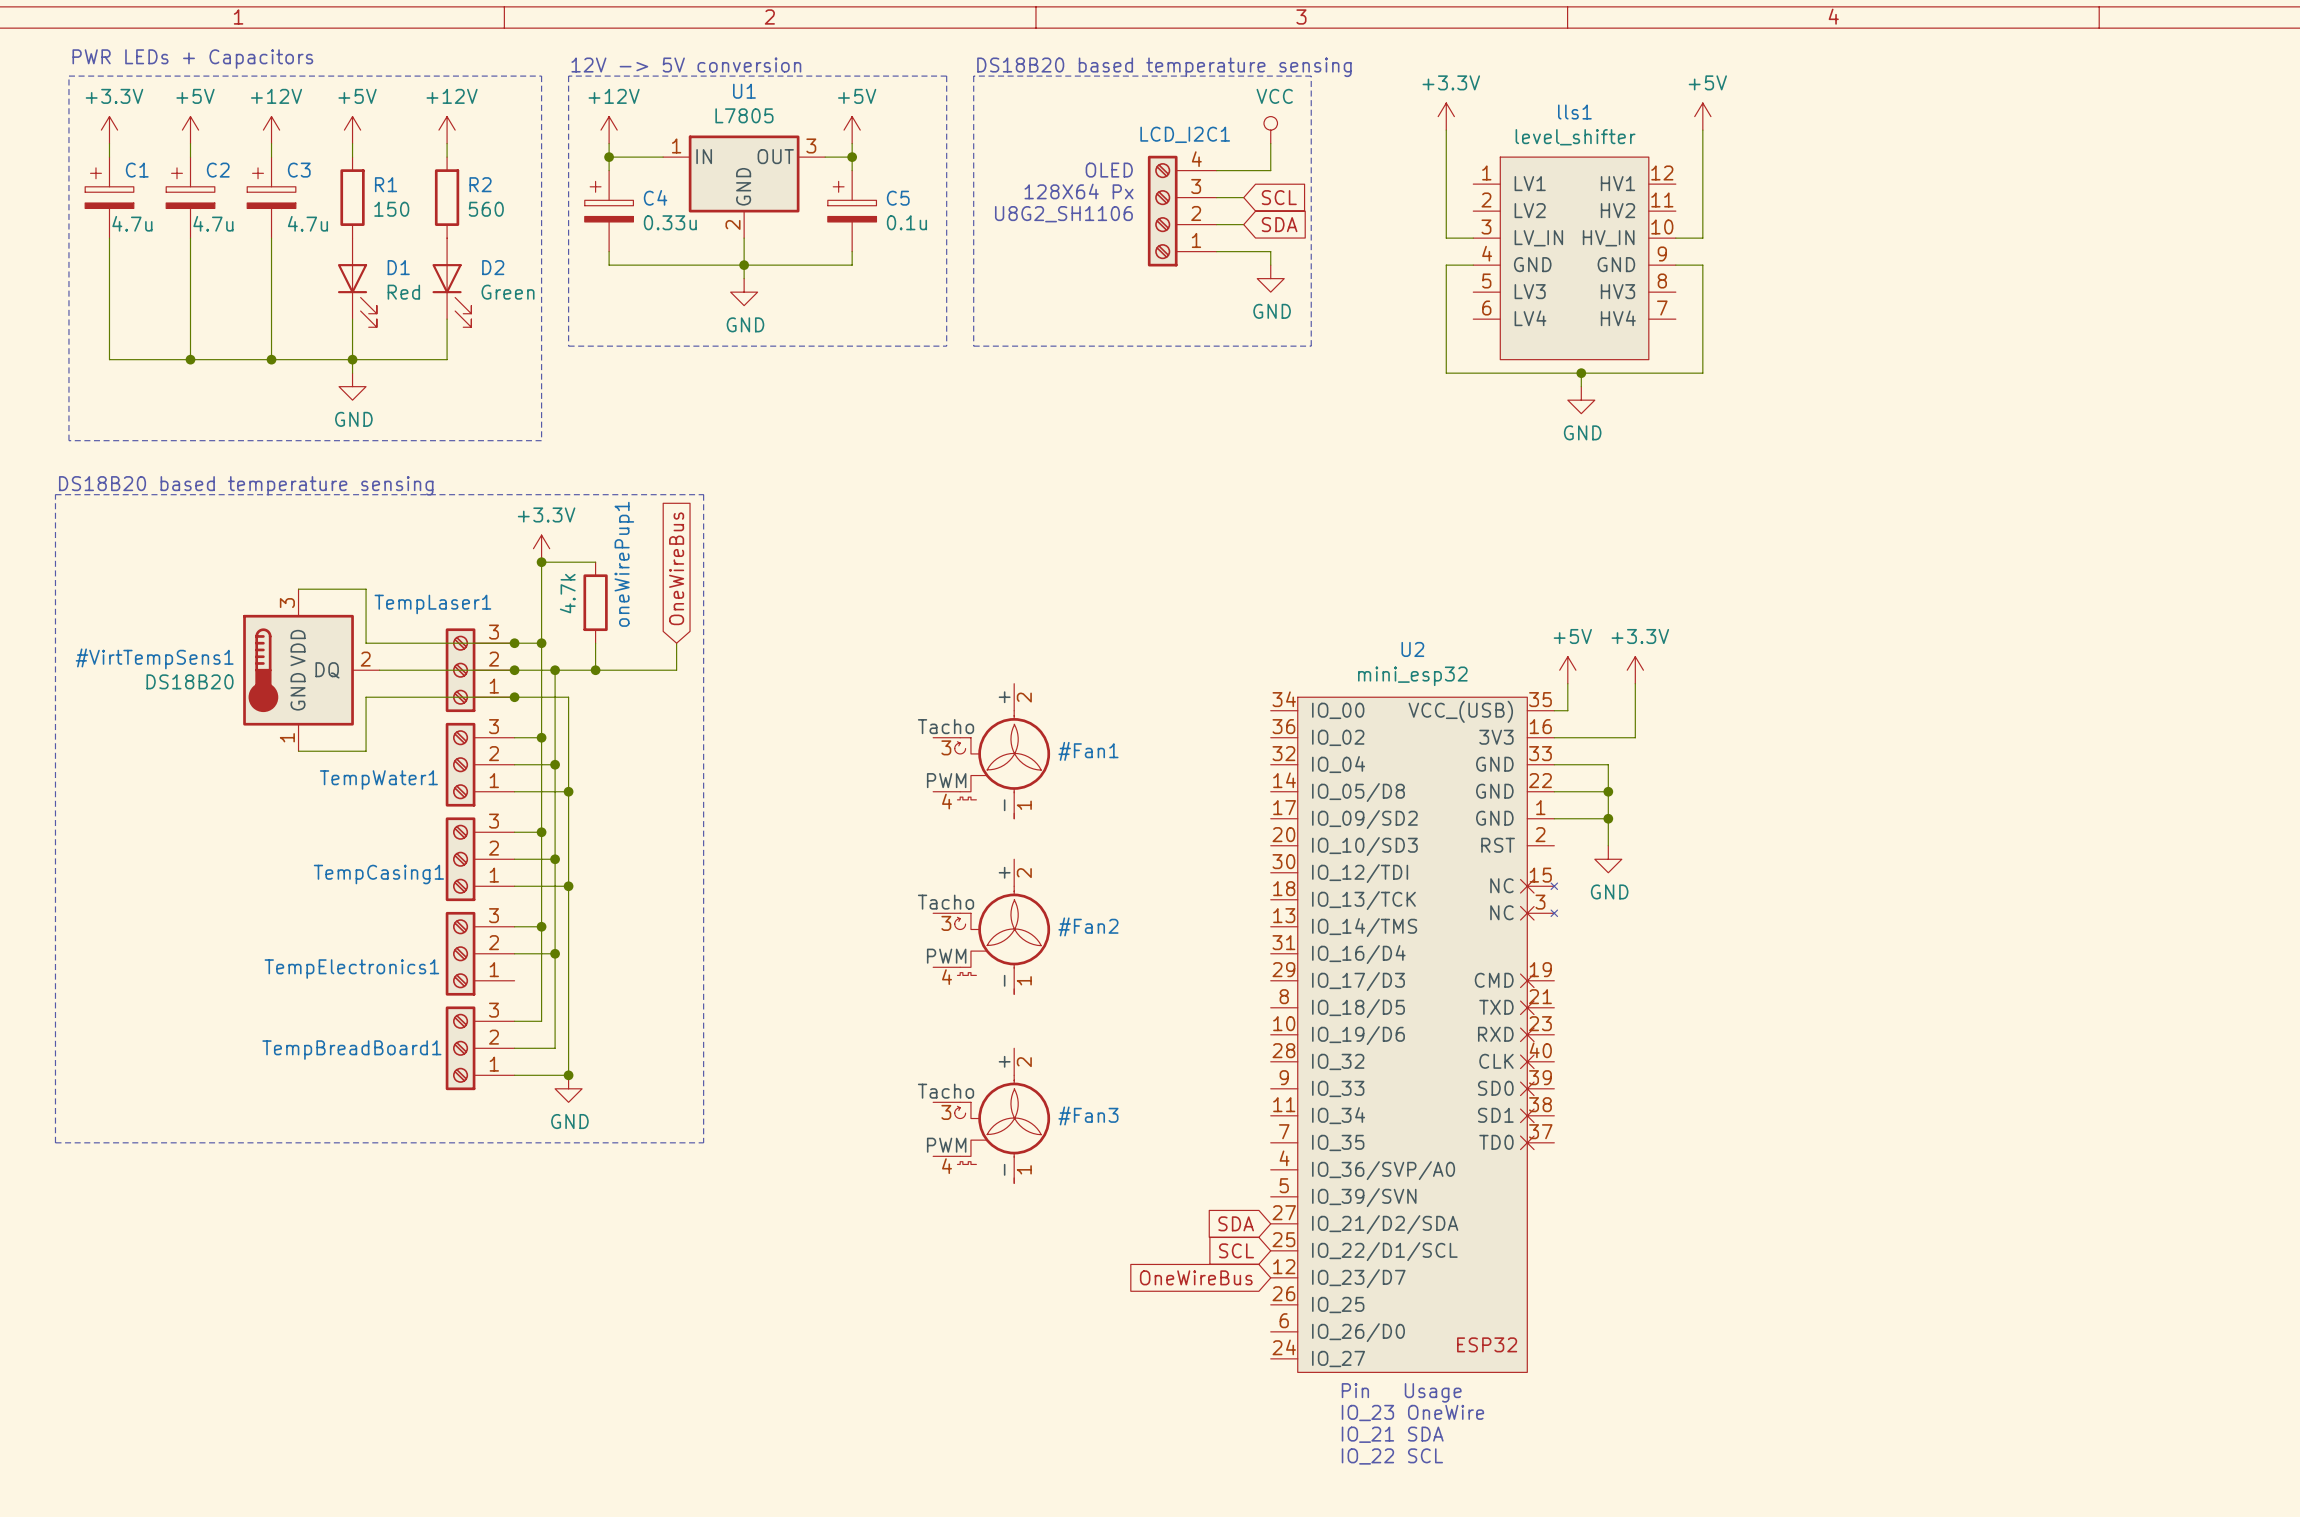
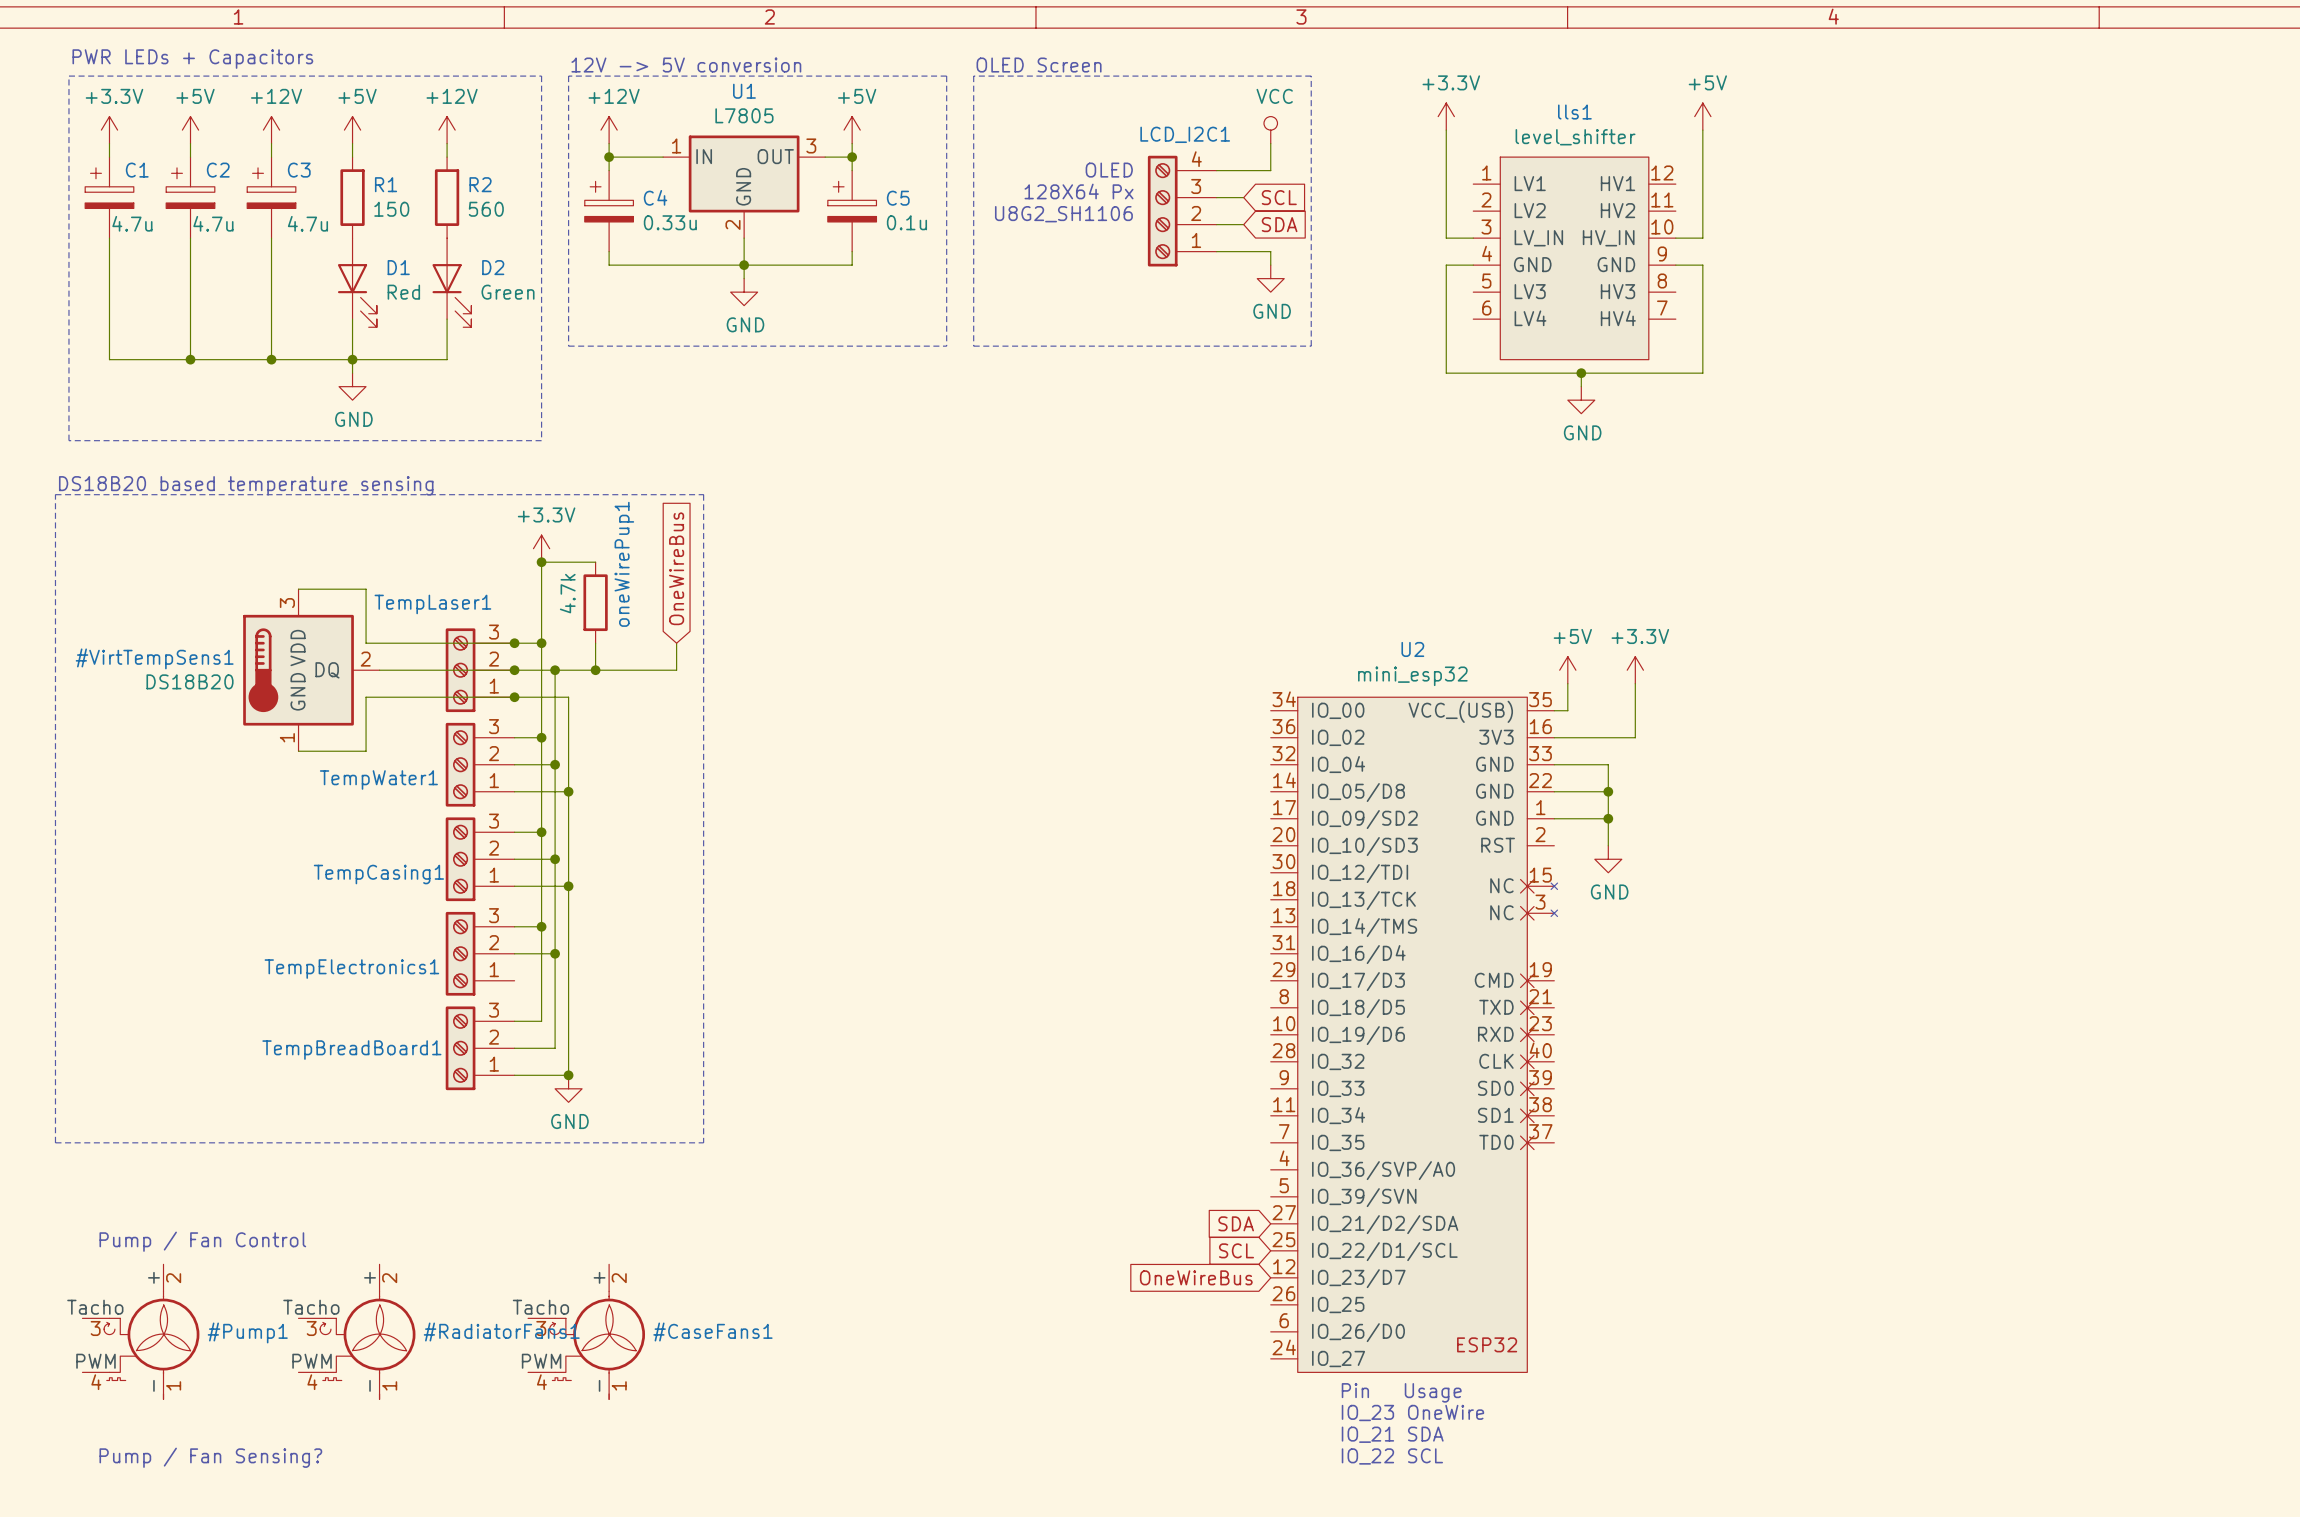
text: DS18B20 based temperature sensing (1164, 67) -> OLED Screen (1039, 65)
#Fan1: (991, 751) -> none
#Fan2: (991, 926) -> none
#Fan3: (991, 1115) -> none
text: none -> Pump / Fan Control (202, 1241)
#Pump1: none -> (140, 1331)
#RadiatorFans1: none -> (356, 1331)
#CaseFans1: none -> (586, 1331)
text: none -> Pump / Fan Sensing? (210, 1457)

